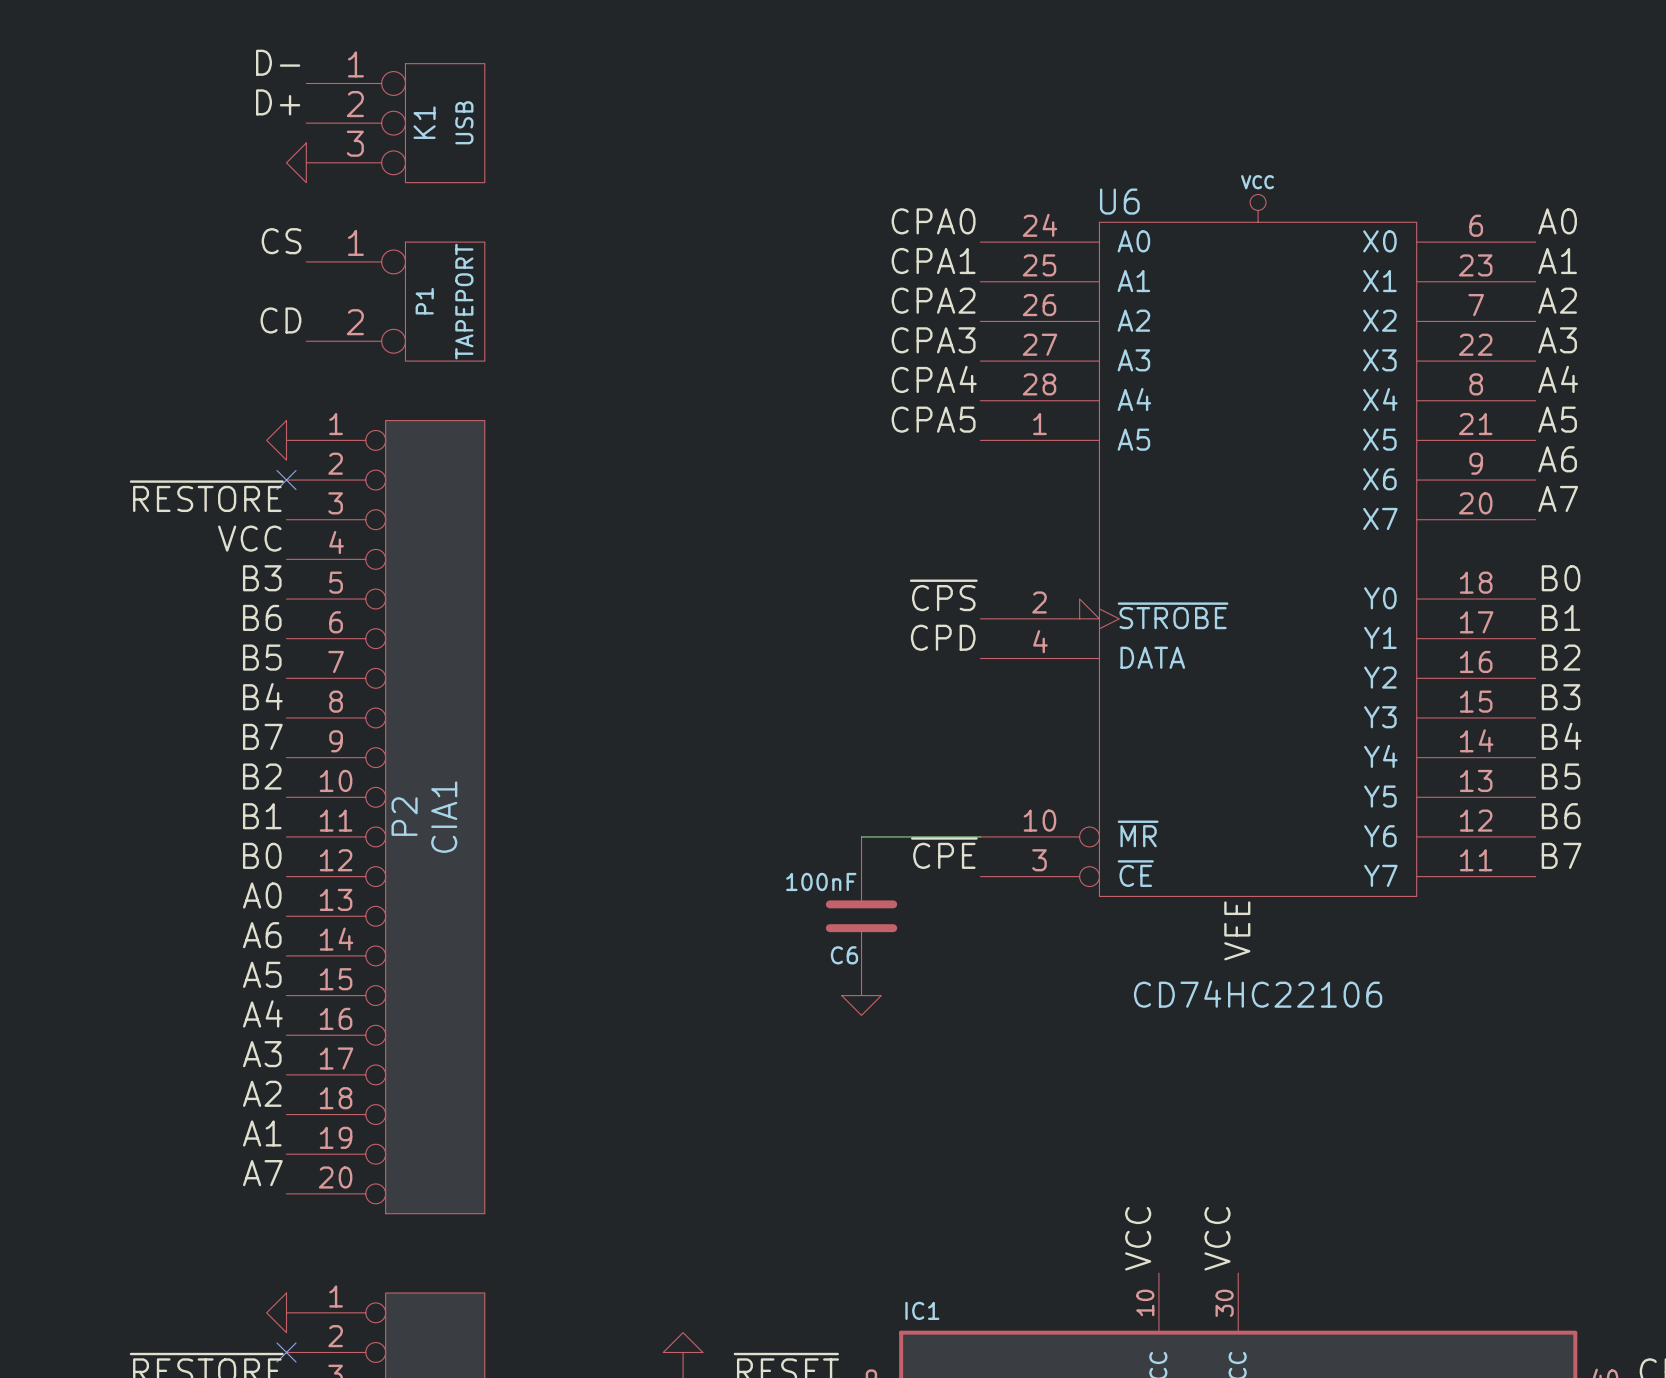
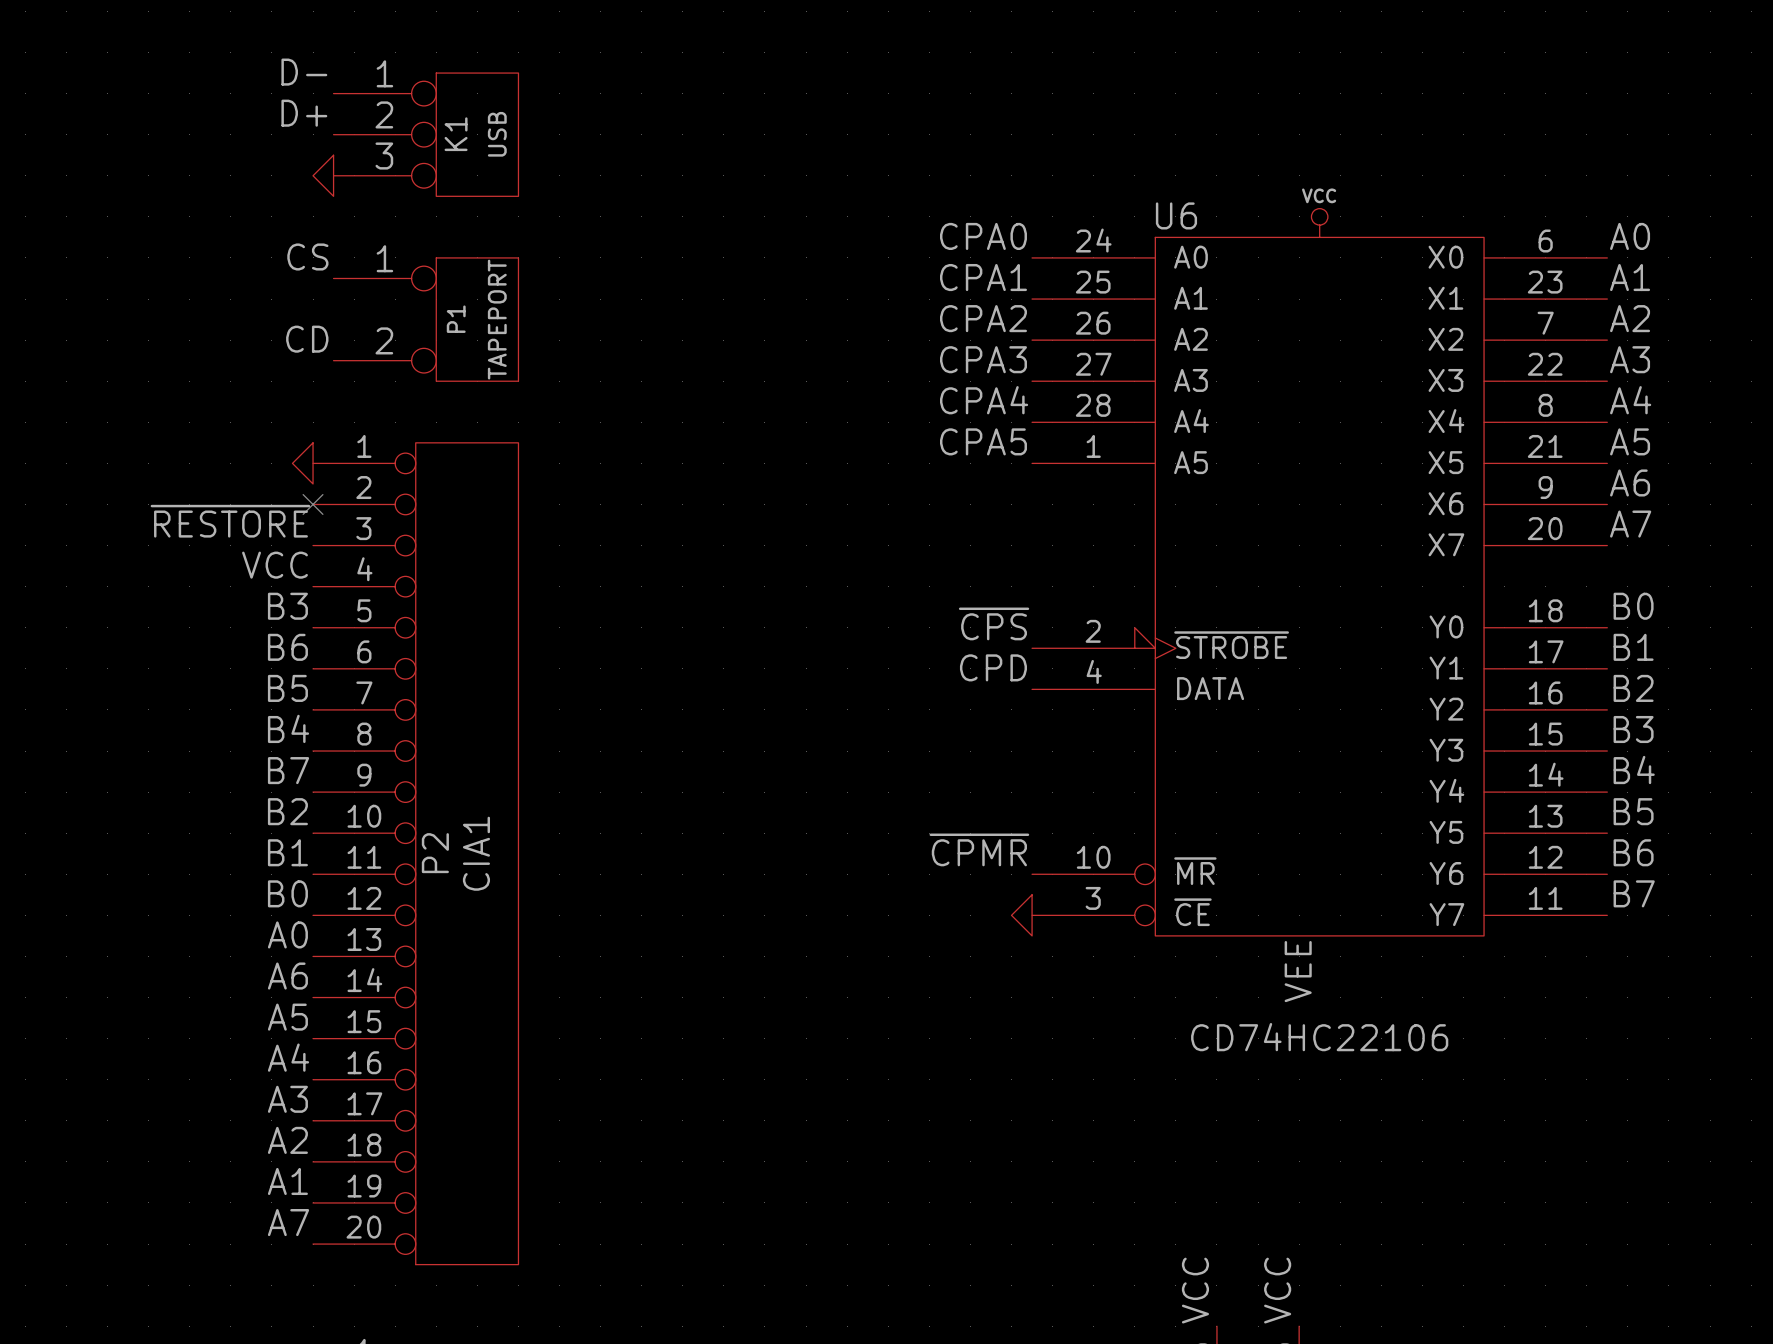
wire: (861, 836) (980, 836) -> none
label: ~{CPE} (944, 853) -> ~{CPMR} (979, 849)
C6: 100nF (861, 916) -> none
power symbol rotation: 0° (861, 1005) -> 90° clockwise (1021, 915)
power symbol position: (861, 1005) -> (1021, 915)

